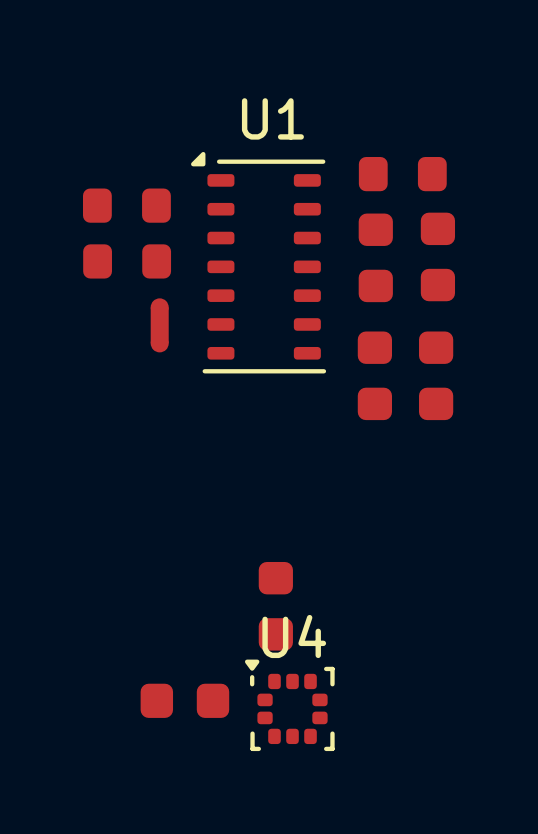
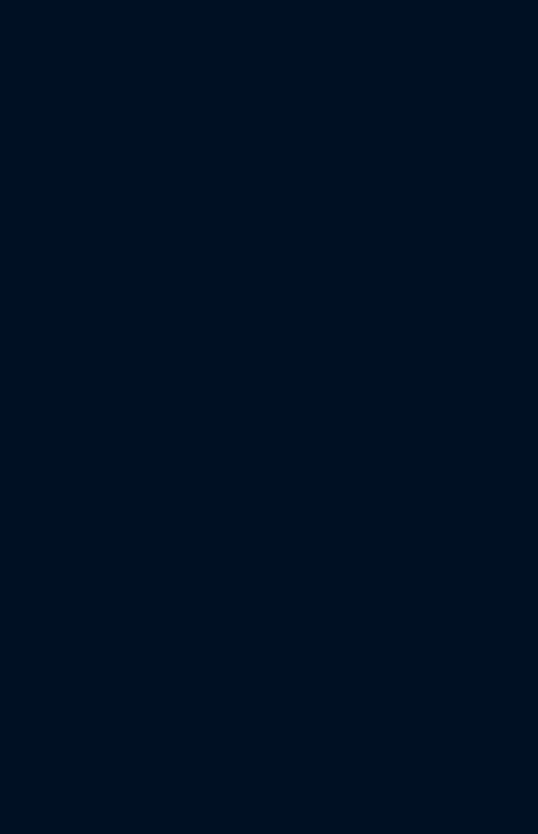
part: (402, 174) -> none
part: (126, 205) -> none
part: (437, 256) -> none
part: (375, 257) -> none
part: (127, 261) -> none
U1: (258, 262) -> none
part: (159, 325) -> none
part: (374, 375) -> none
part: (436, 375) -> none
part: (275, 606) -> none
part: (184, 700) -> none
U4: (289, 705) -> none

